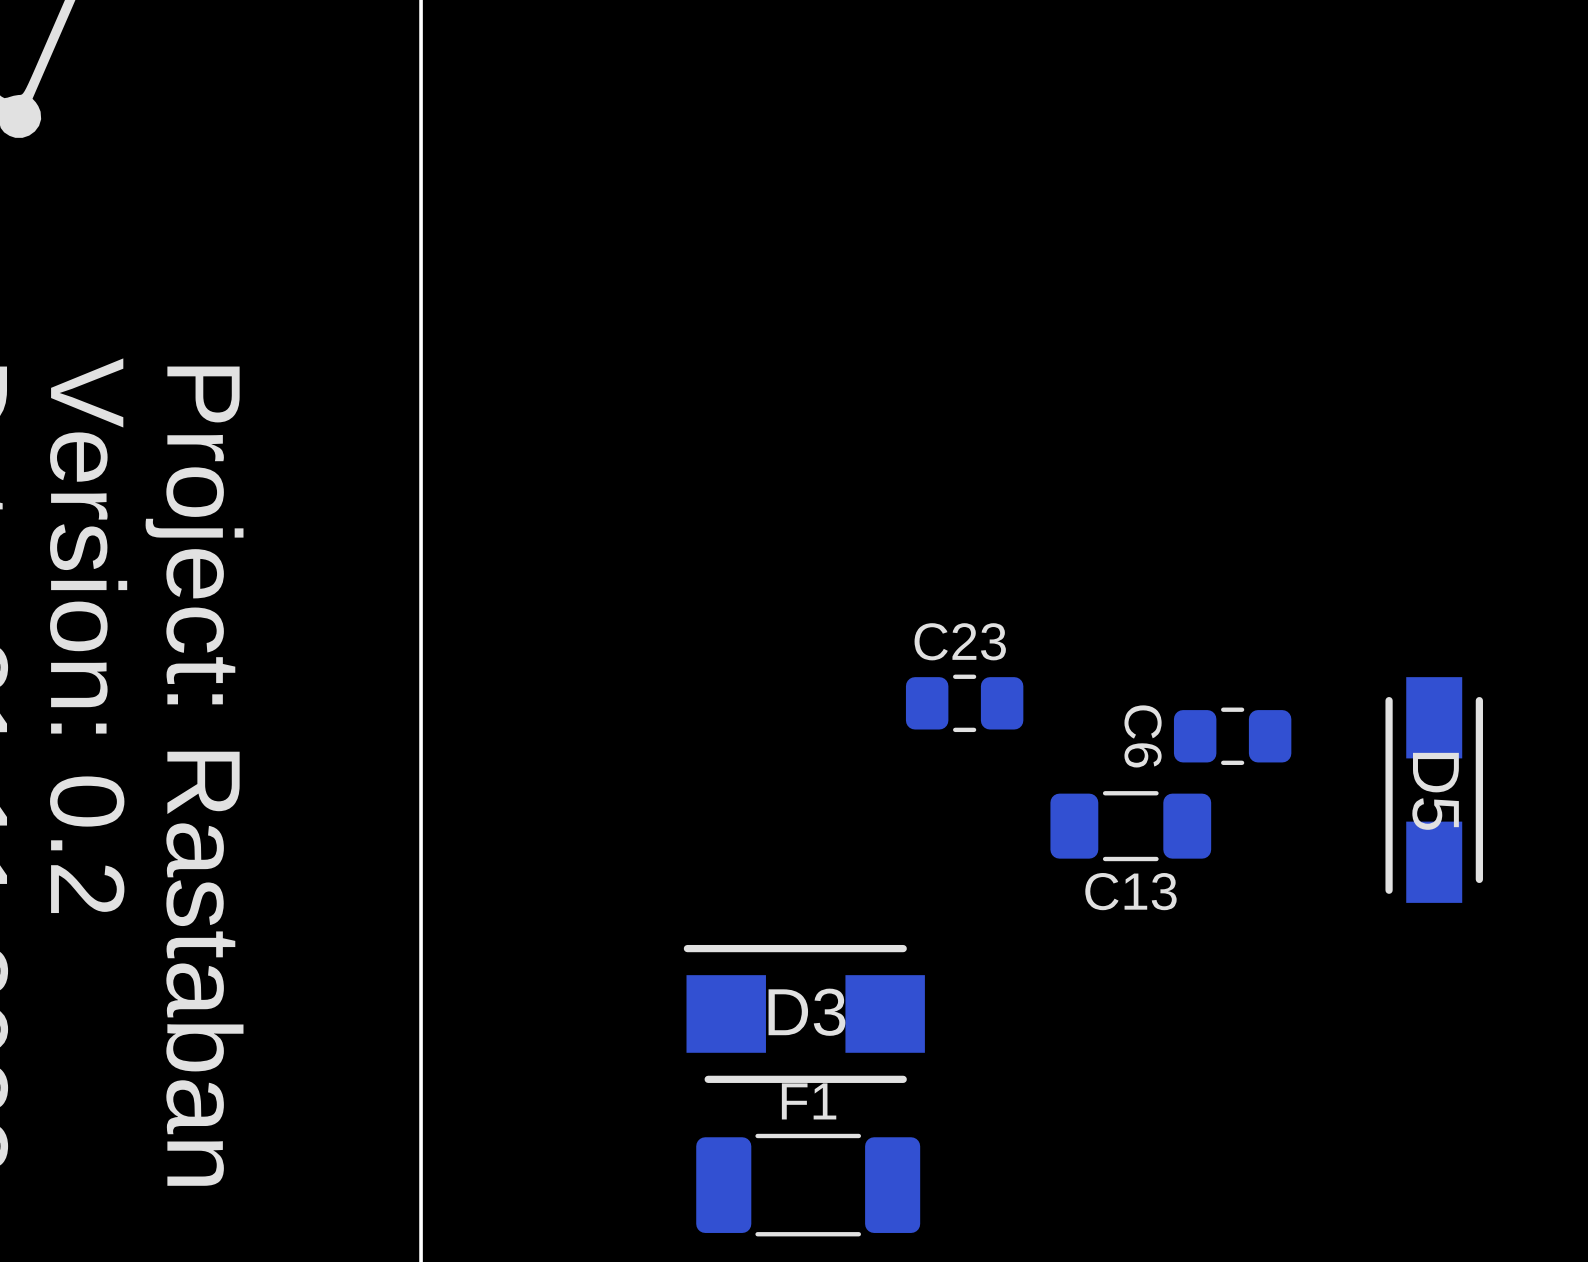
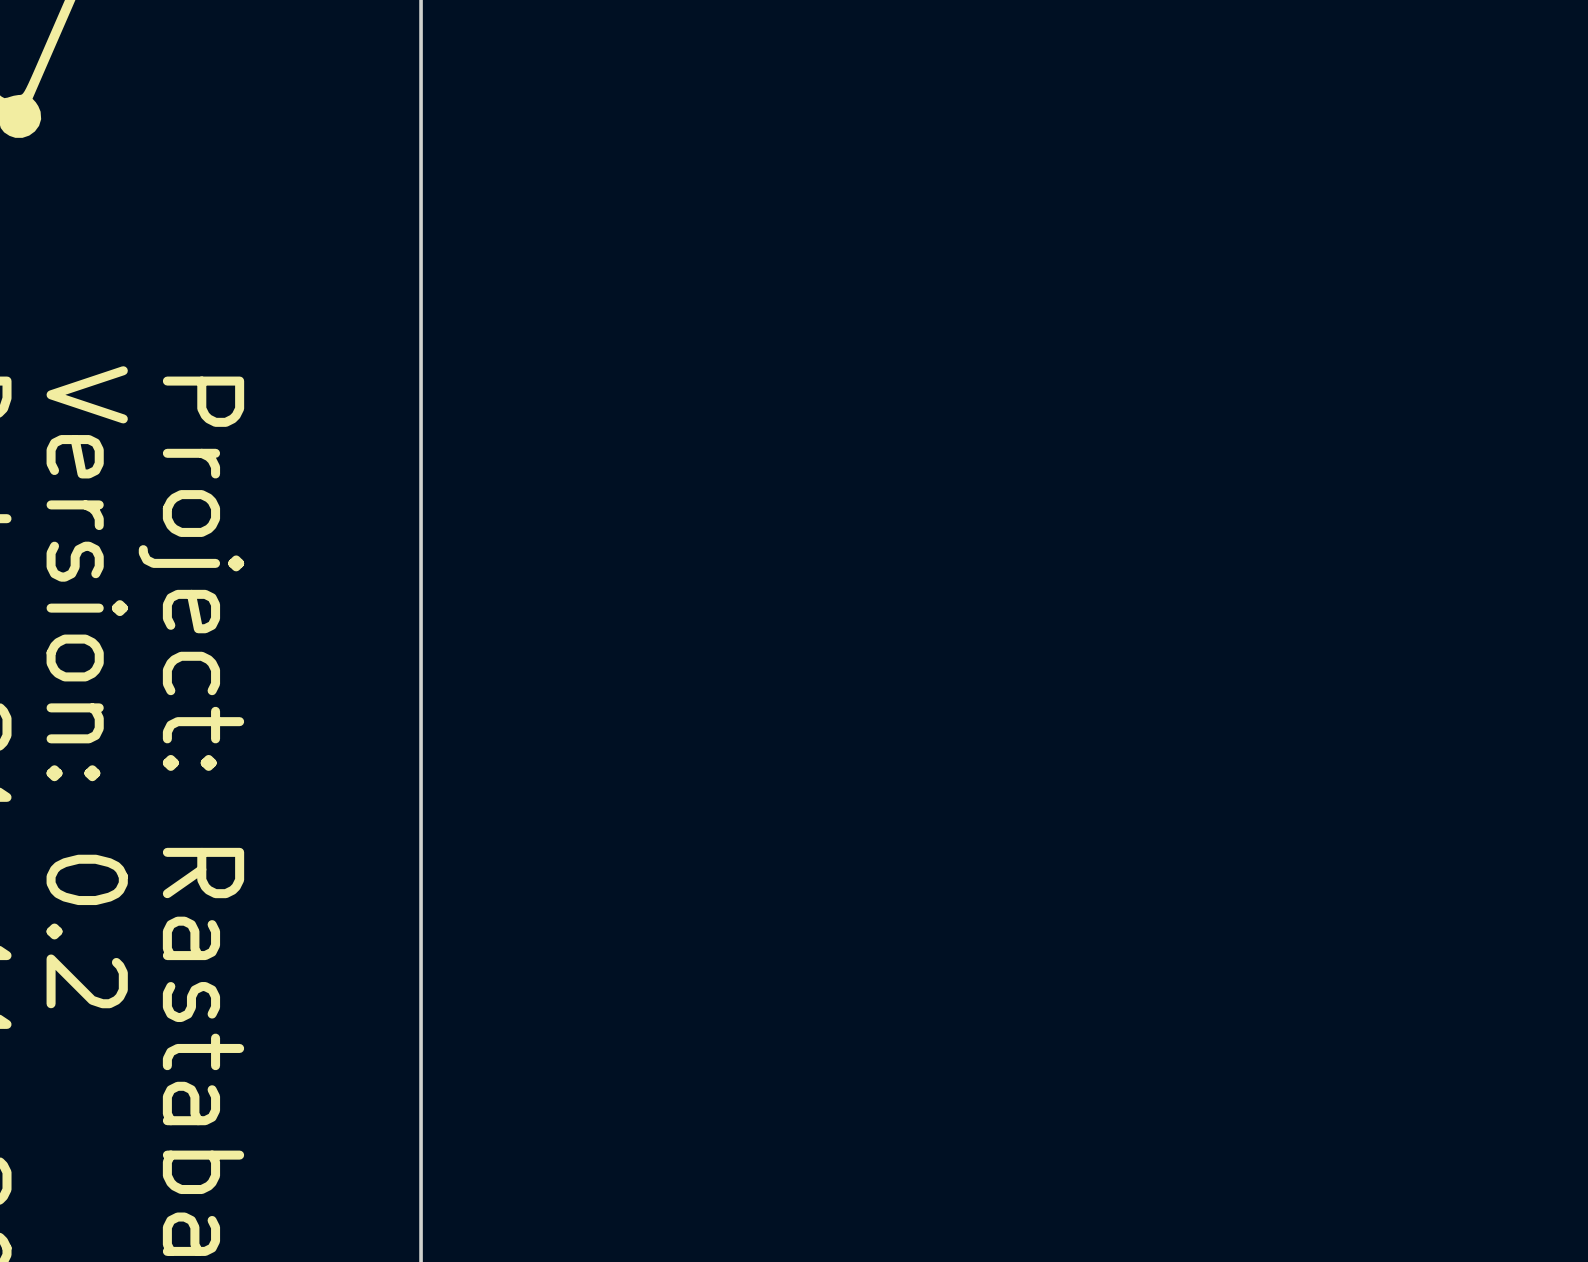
C23: (964, 703) -> none
C6: (1232, 736) -> none
D5: (1434, 790) -> none
C13: (1130, 826) -> none
D3: (804, 1013) -> none
F1: (808, 1185) -> none

